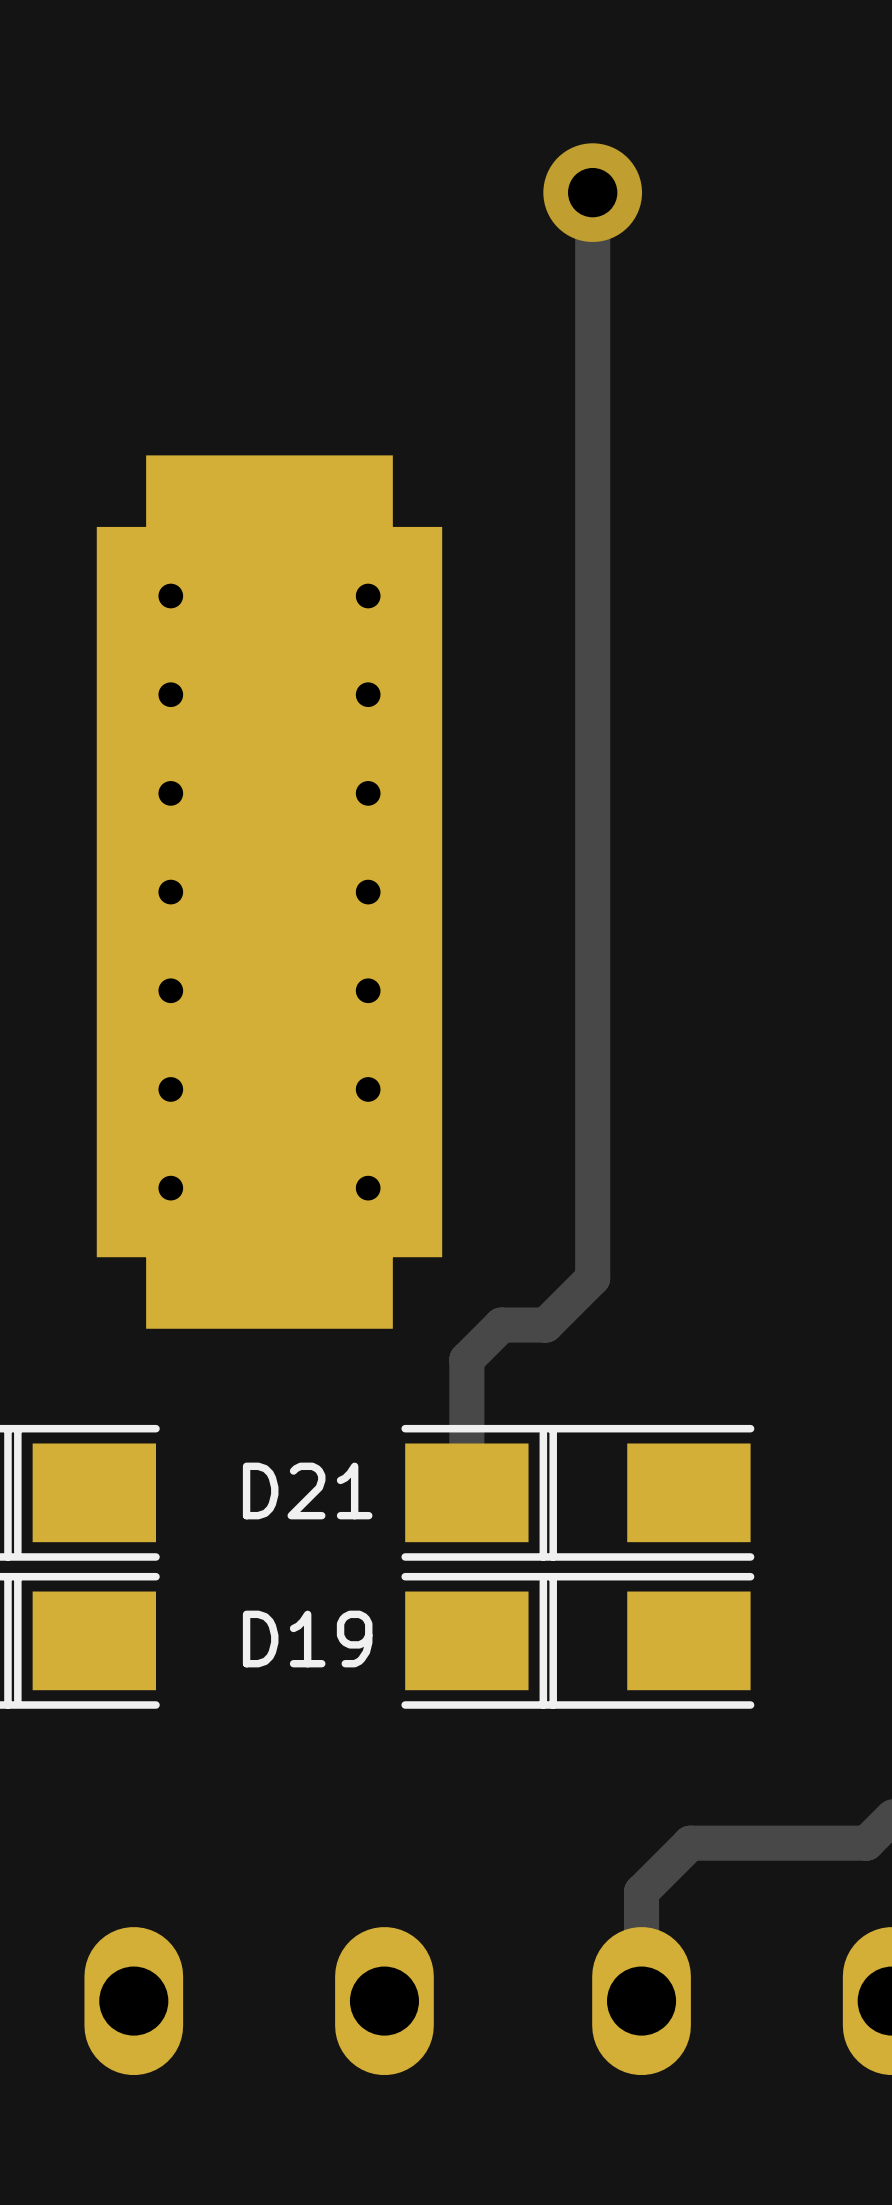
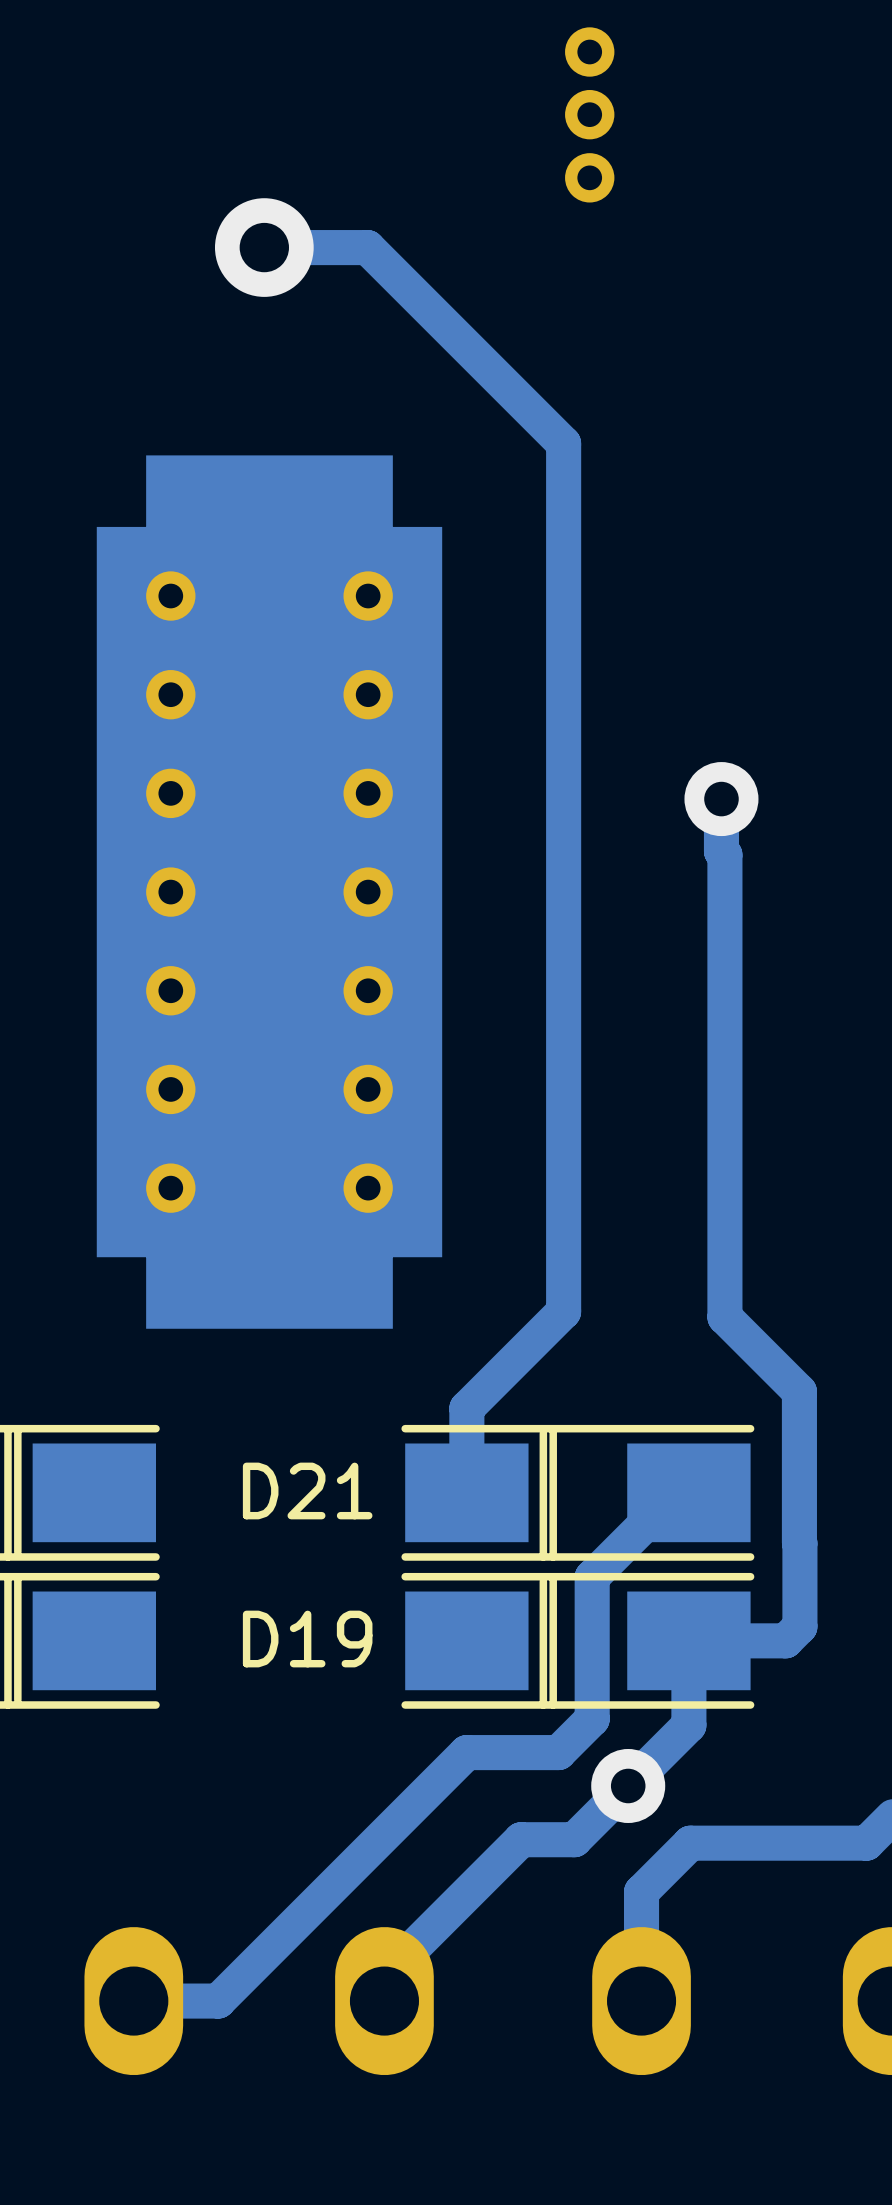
part: none -> (589, 52)
part: none -> (589, 114)
part: none -> (589, 177)
track: (592, 192) (592, 1278) (545, 1325) (501, 1325) (466, 1359) (466, 1408) -> (264, 247) (367, 247) (563, 443) (563, 1311) (466, 1408)
via: (592, 192) -> none
via: none -> (264, 247)
track: none -> (721, 799) (721, 851) (724, 854) (724, 1317) (799, 1391) (799, 1542)
via: none -> (721, 799)
track: none -> (688, 1492) (676, 1492) (592, 1577) (592, 1719) (558, 1752) (466, 1752) (218, 2001) (133, 2001)
track: none -> (799, 1543) (799, 1626) (785, 1640) (688, 1640) (688, 1725) (574, 1839) (521, 1839) (384, 1976) (384, 2001)
via: none -> (628, 1785)

